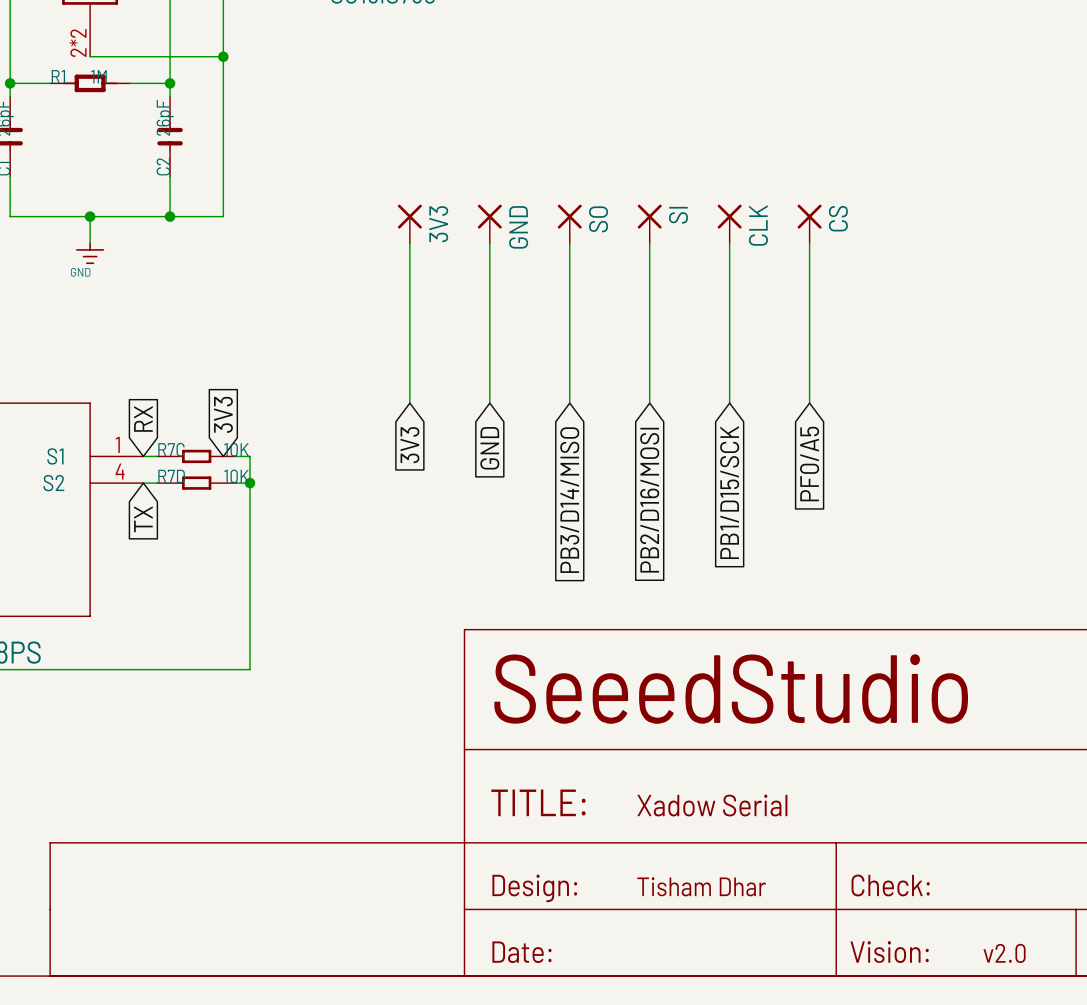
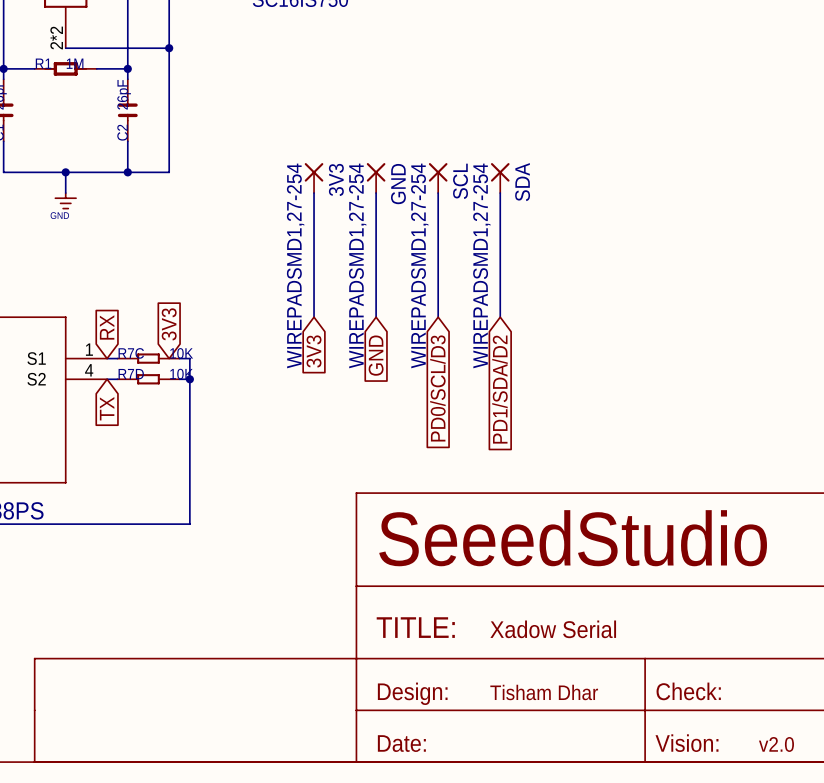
SI name: SI (678, 215) -> SDA (522, 182)
SO name: SO (598, 219) -> SCL (460, 181)
CLK: (729, 223) -> none
CS: (809, 223) -> none
wire: (729, 243) (729, 403) -> none
wire: (809, 243) (809, 403) -> none
3V3 value: none -> WIREPADSMD1,27-254 (295, 265)
GND value: none -> WIREPADSMD1,27-254 (357, 265)
SO value: none -> WIREPADSMD1,27-254 (419, 265)
SI value: none -> WIREPADSMD1,27-254 (481, 265)
global label: PF0/A5 (809, 464) -> none
global label: PB1/D15/SCK (729, 492) -> none
global label: PB3/D14/MISO (569, 500) -> PD0/SCL/D3 (437, 388)
global label: PB2/D16/MOSI (649, 500) -> PD1/SDA/D2 (499, 389)

